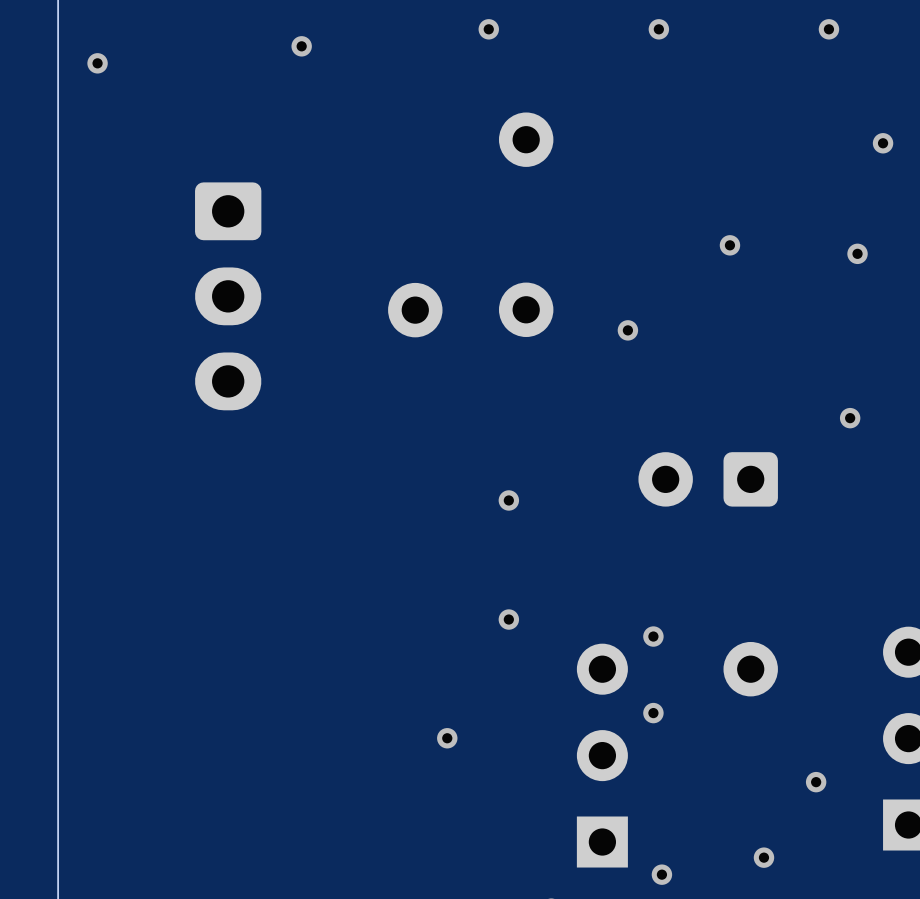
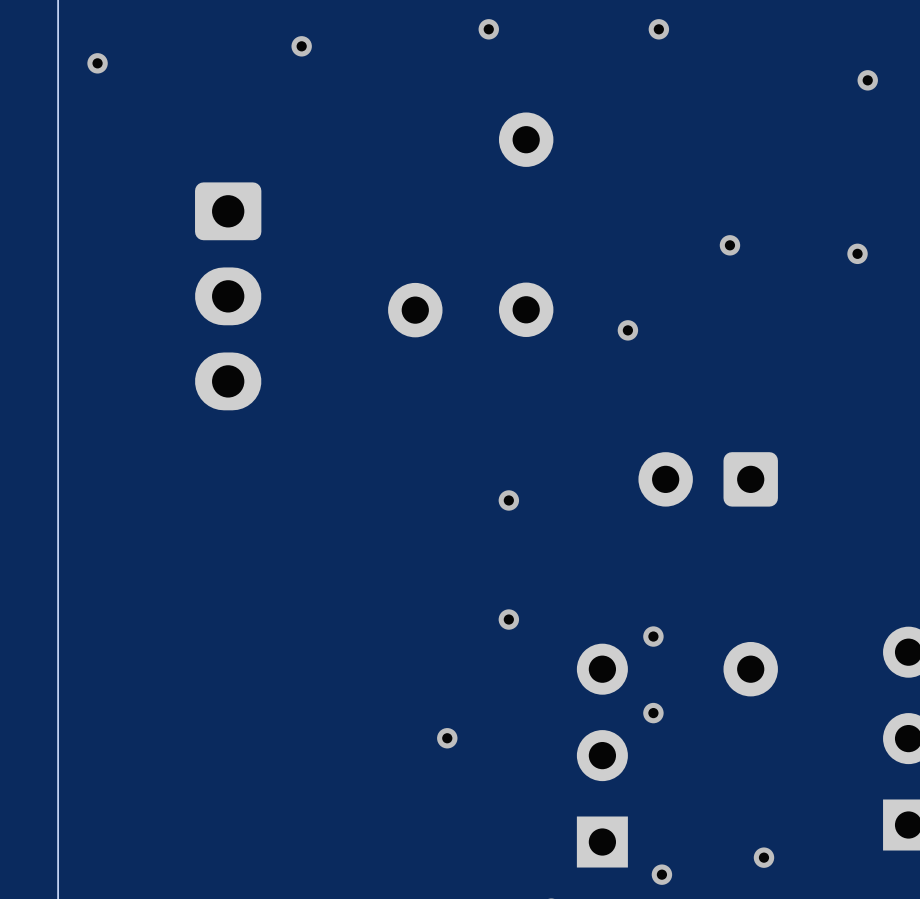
via: (828, 29) -> none
via: none -> (867, 80)
via: (883, 143) -> none
via: (850, 418) -> none
via: (816, 782) -> none

